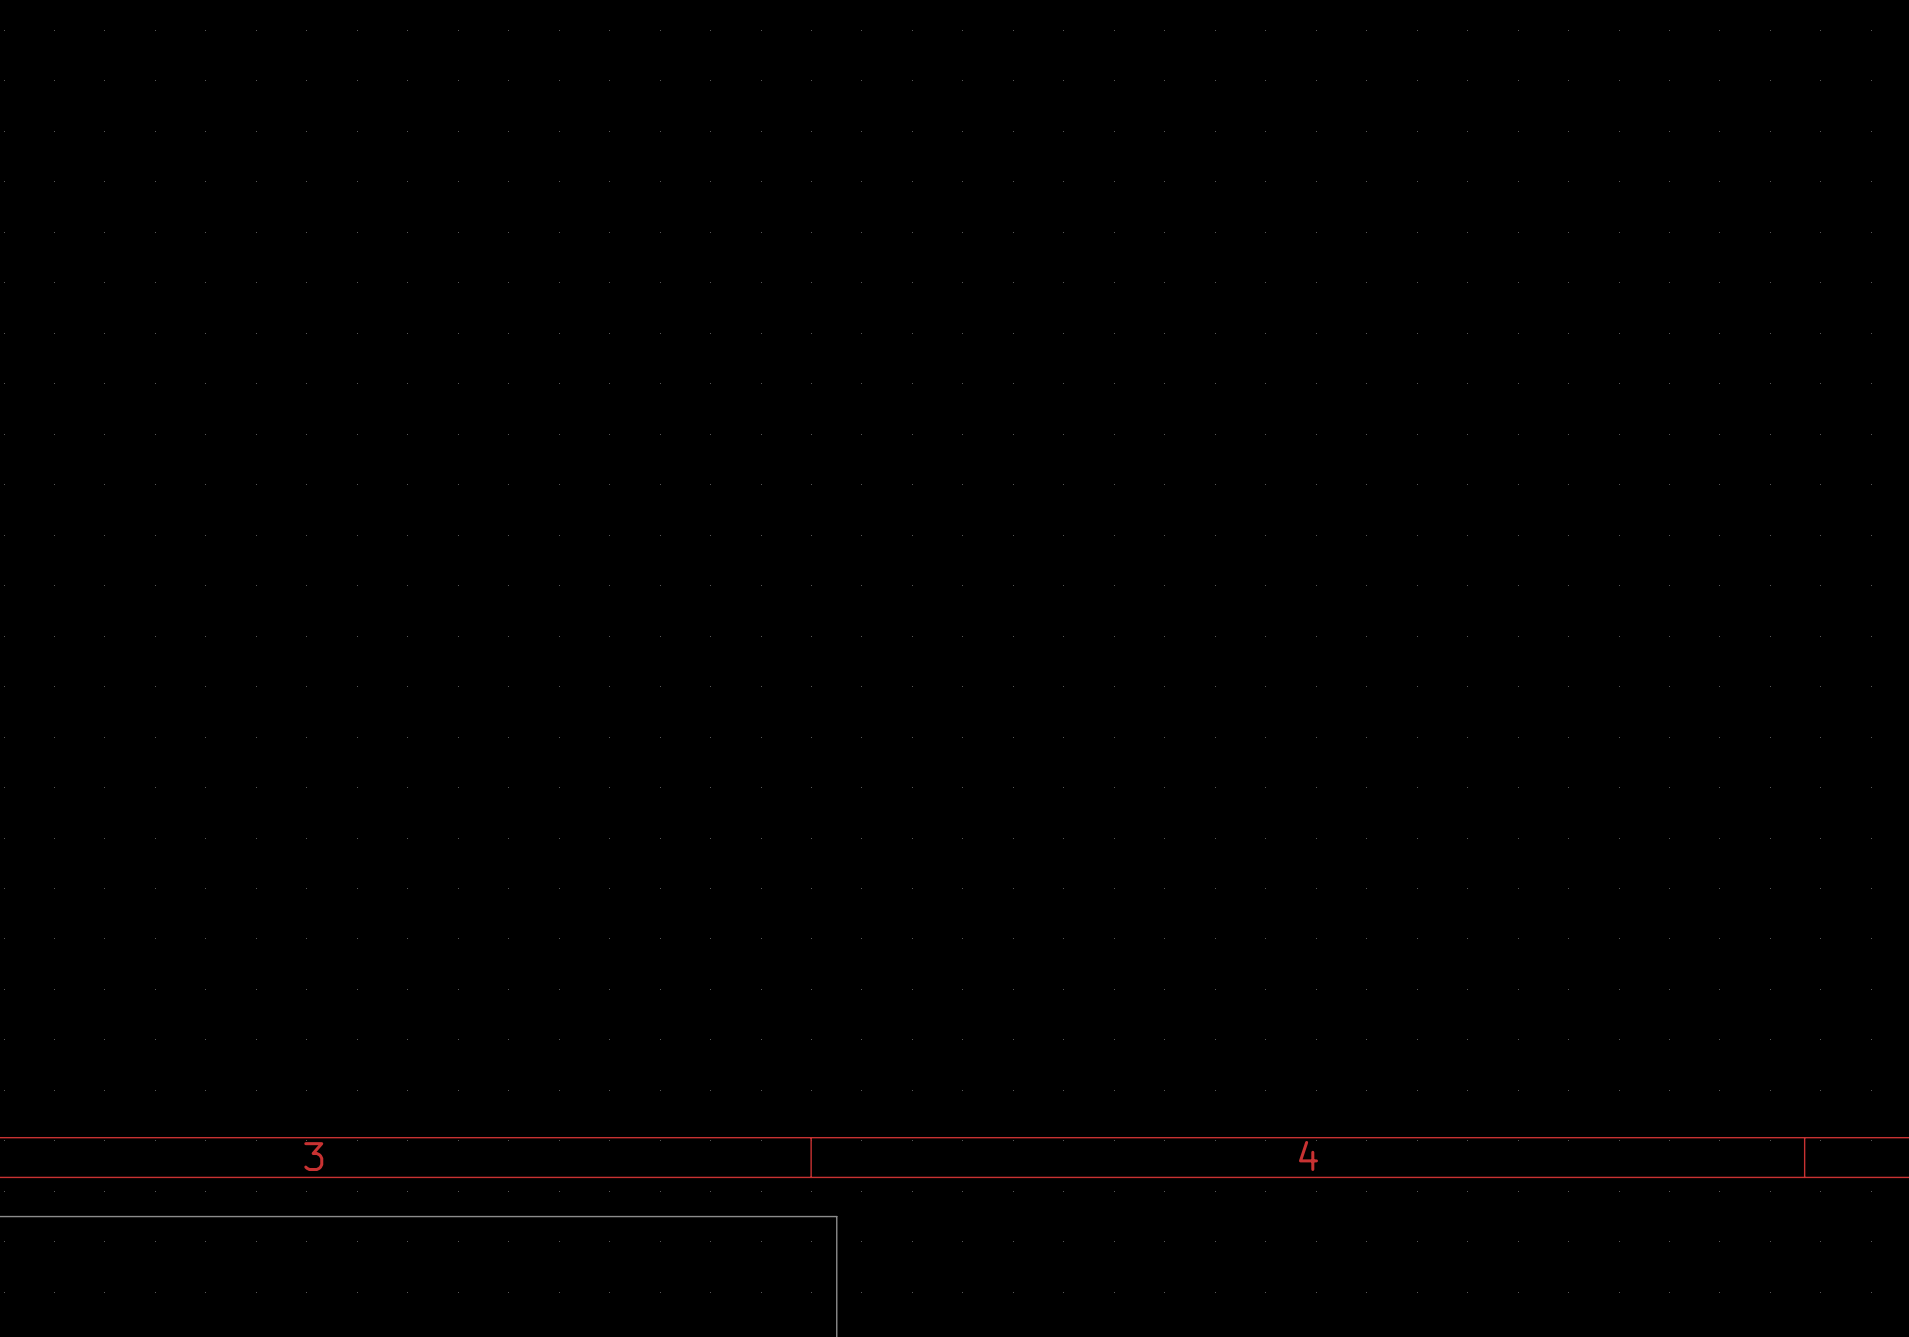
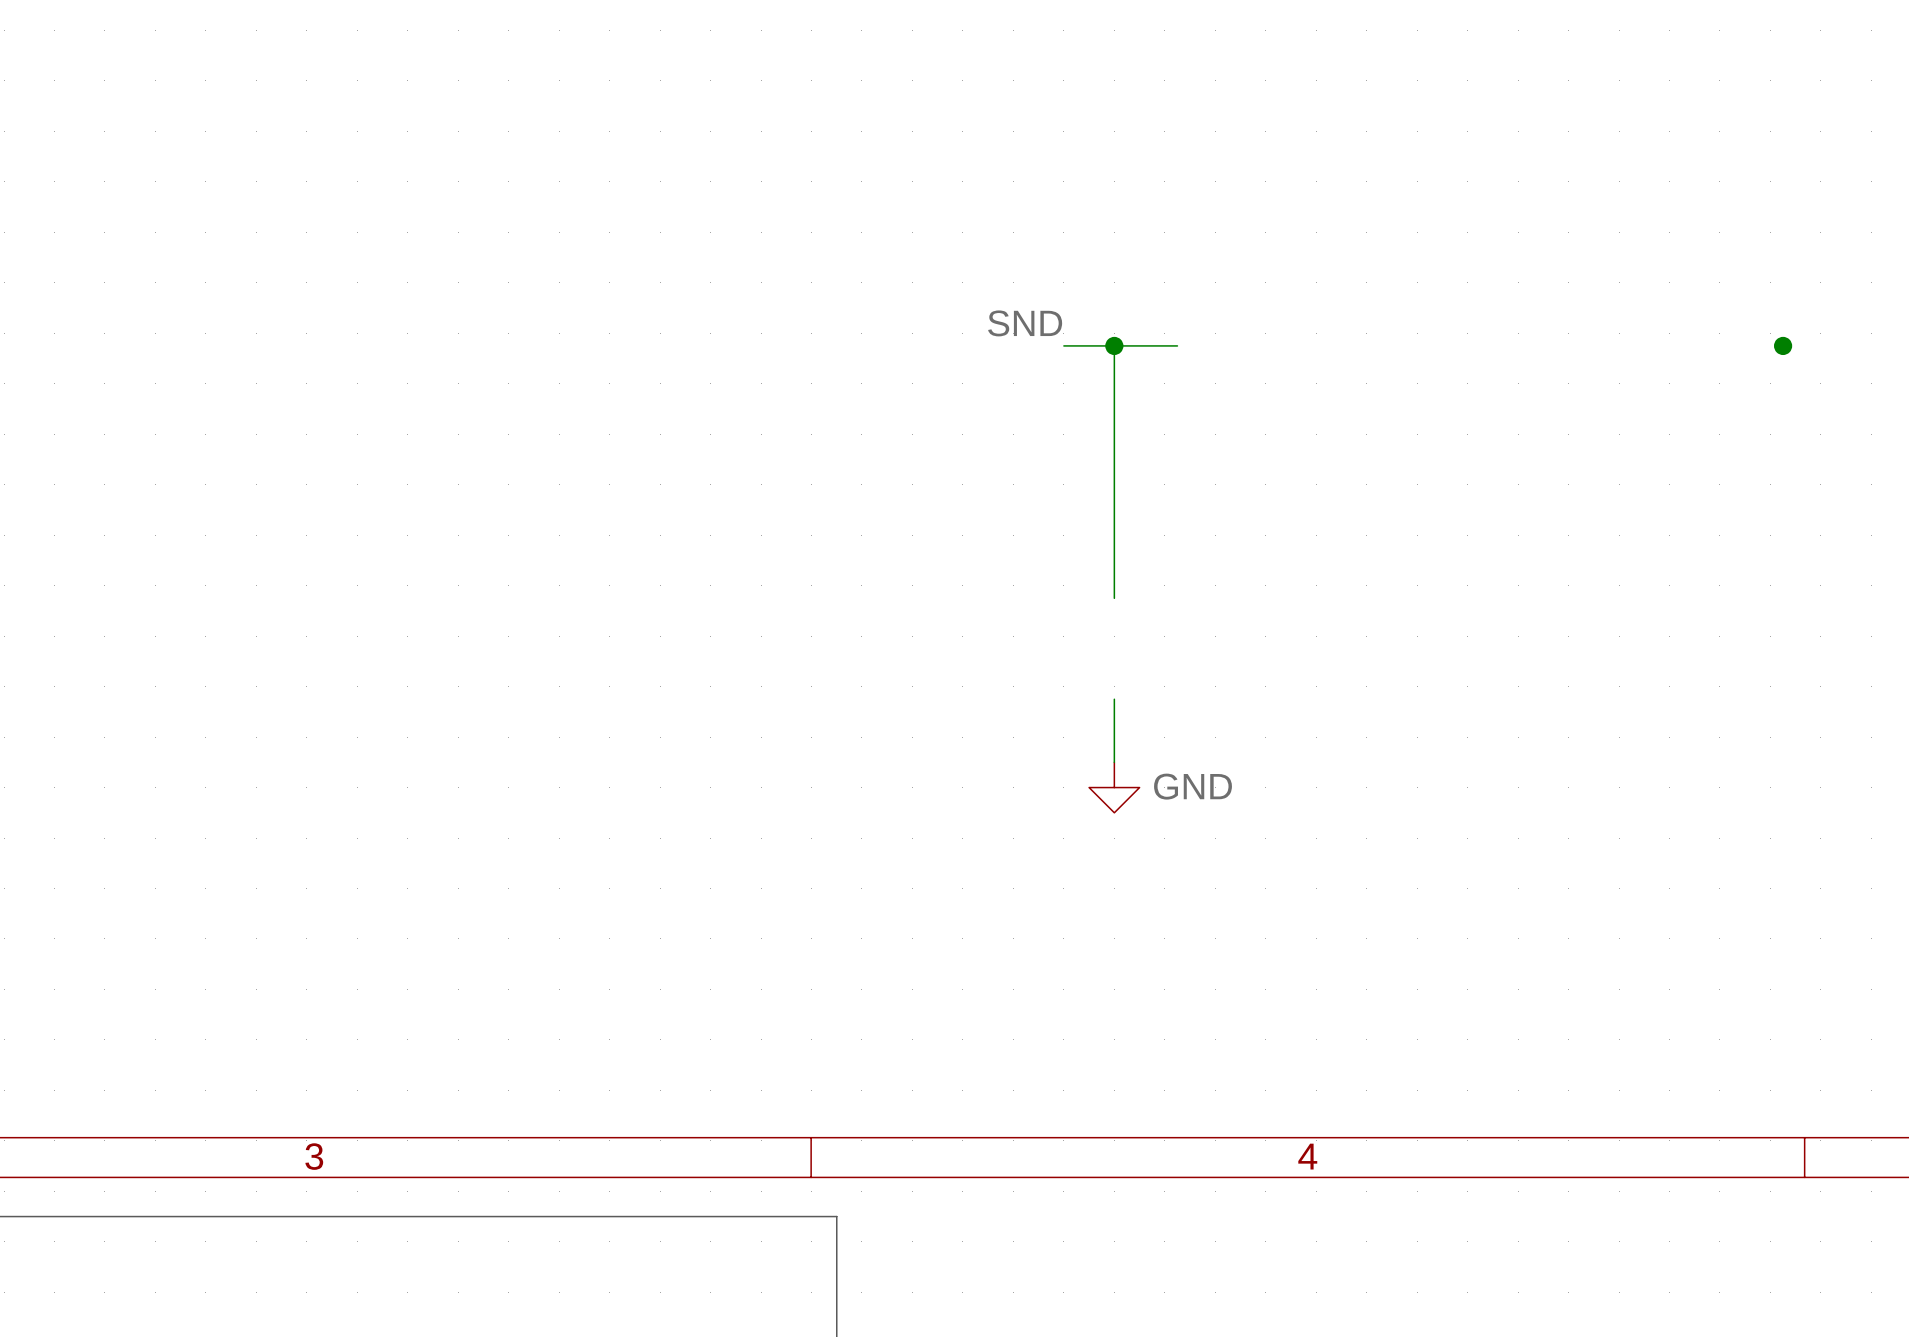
label: none -> SND (1025, 323)
wire: none -> (1063, 345) (1177, 345)
wire: none -> (1114, 345) (1114, 598)
junction: none -> (1114, 345)
junction: none -> (1783, 345)
wire: none -> (1114, 699) (1114, 762)
power symbol: none -> GND (1114, 787)

